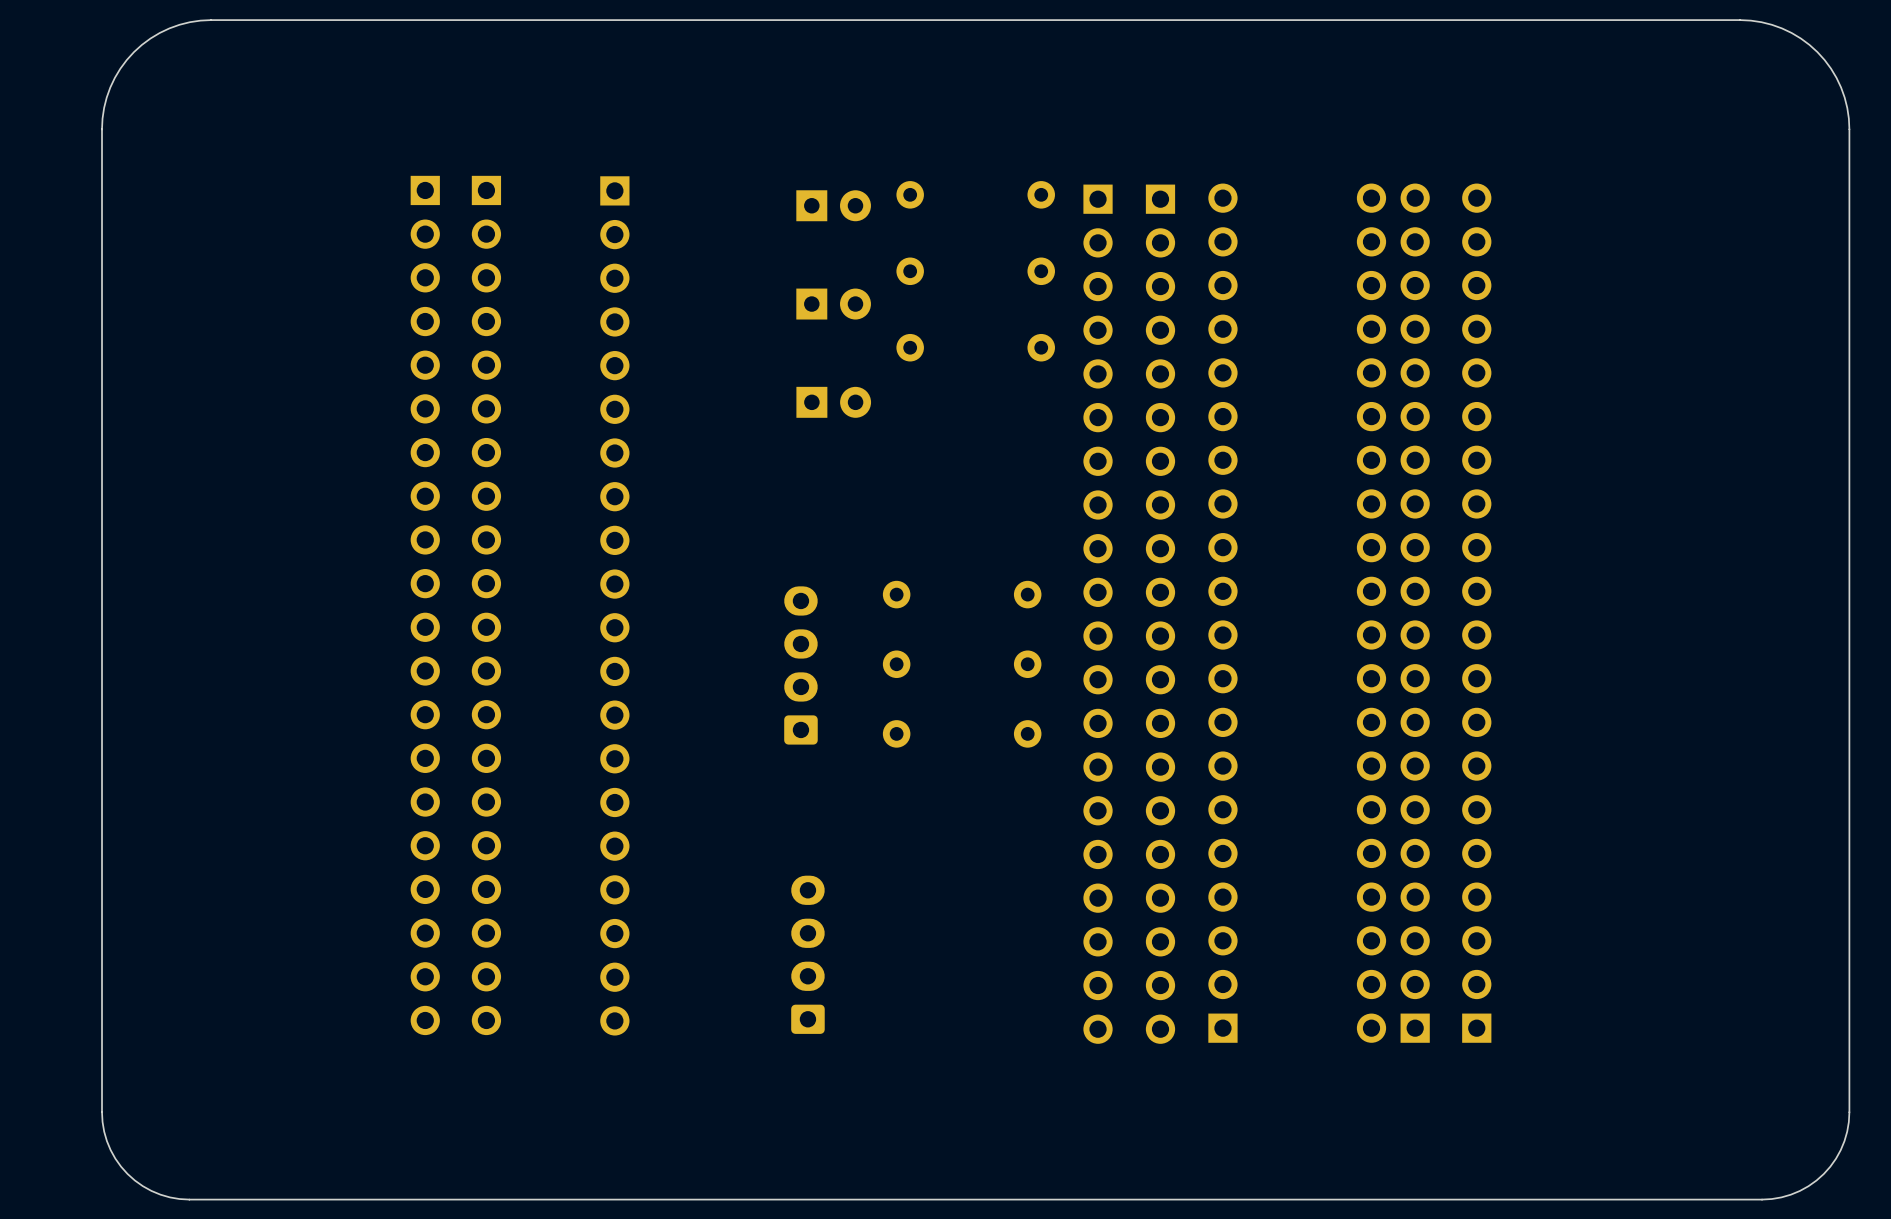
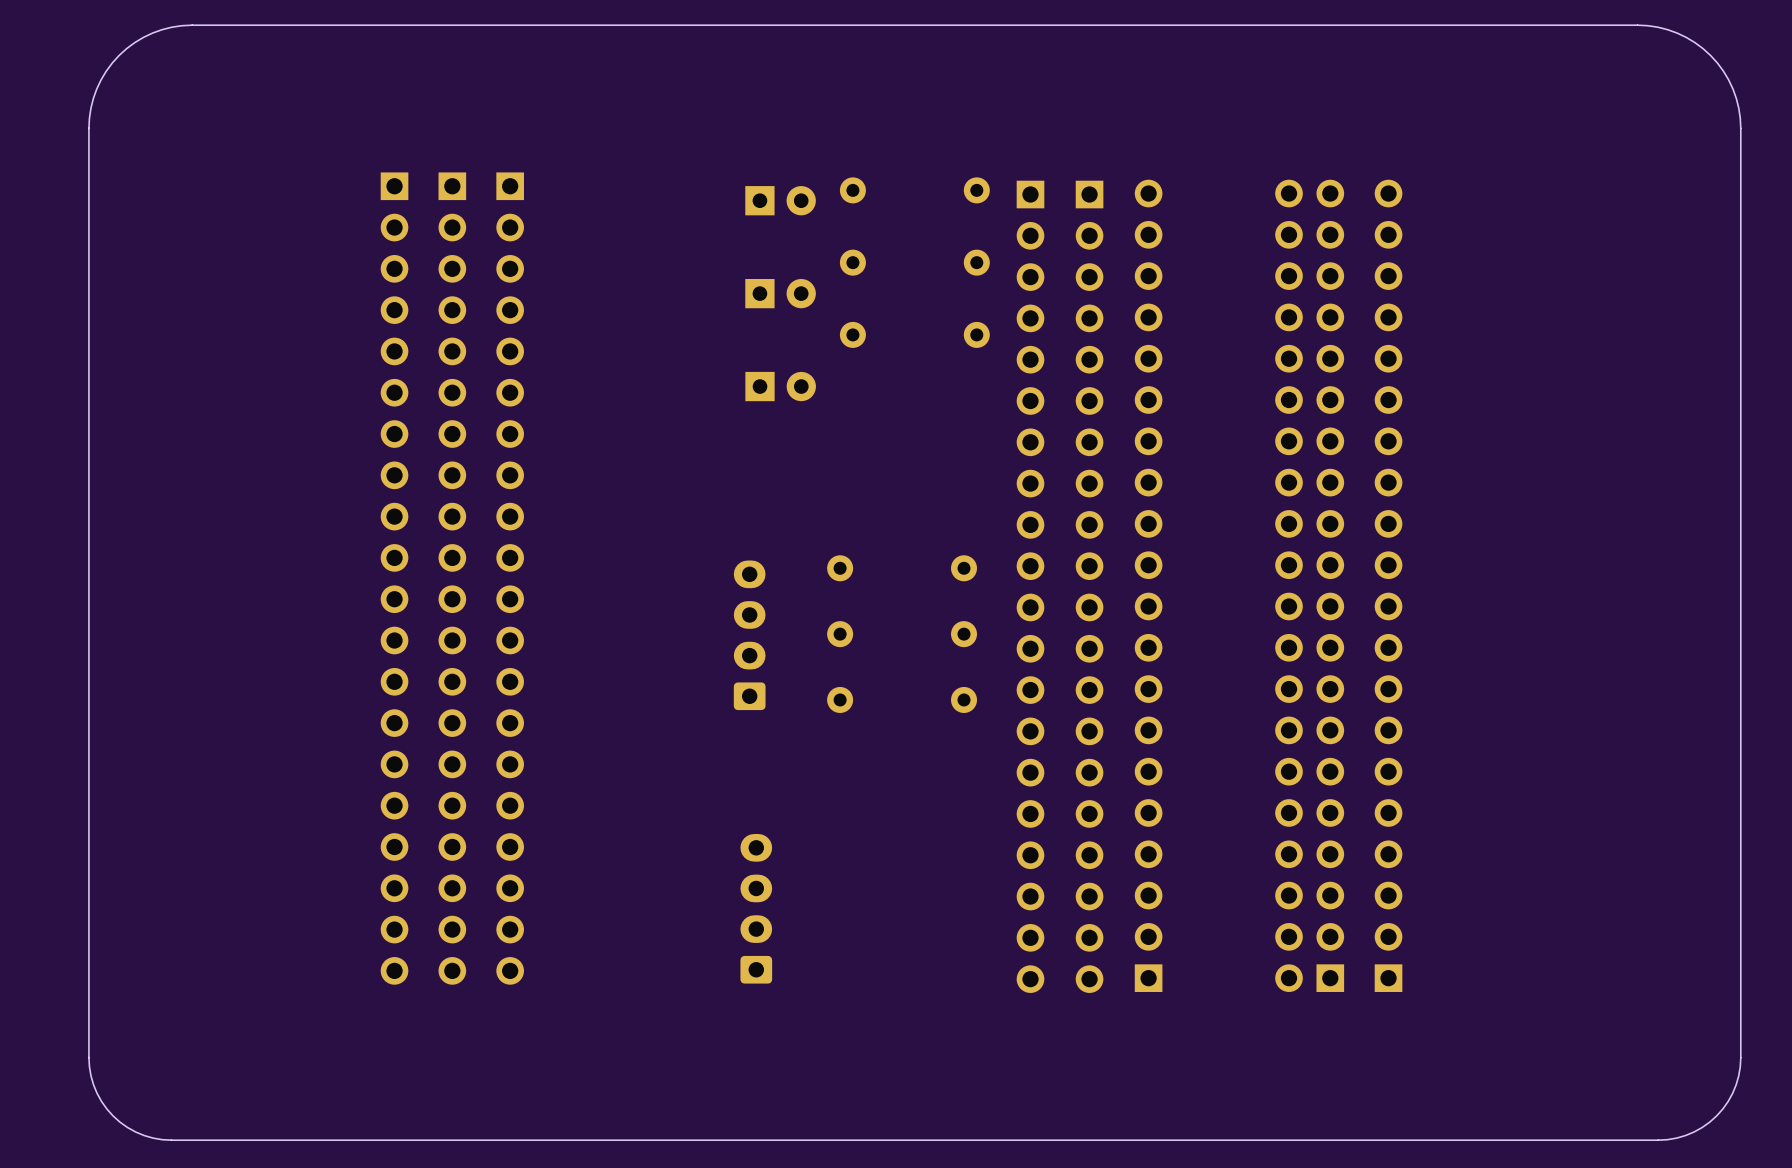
part position: (614, 605) -> (510, 578)

